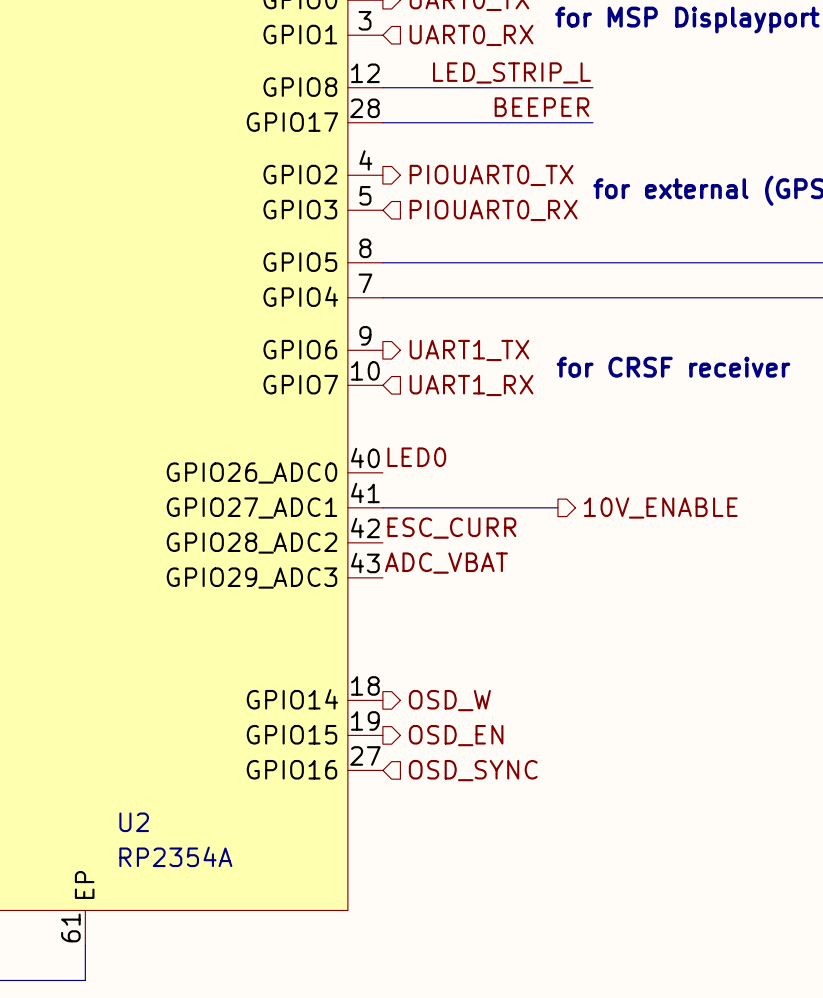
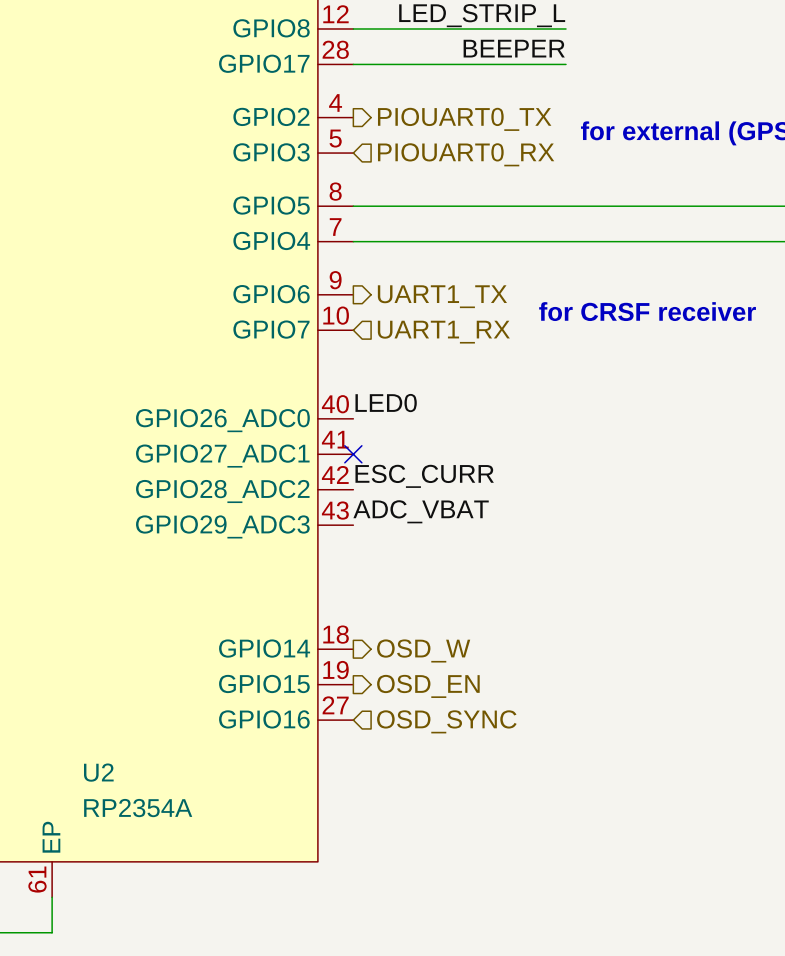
wire: (382, 507) (557, 507) -> none
no-connect mark: none -> (353, 454)
hierarchical label: 10V_ENABLE (660, 508) -> none

